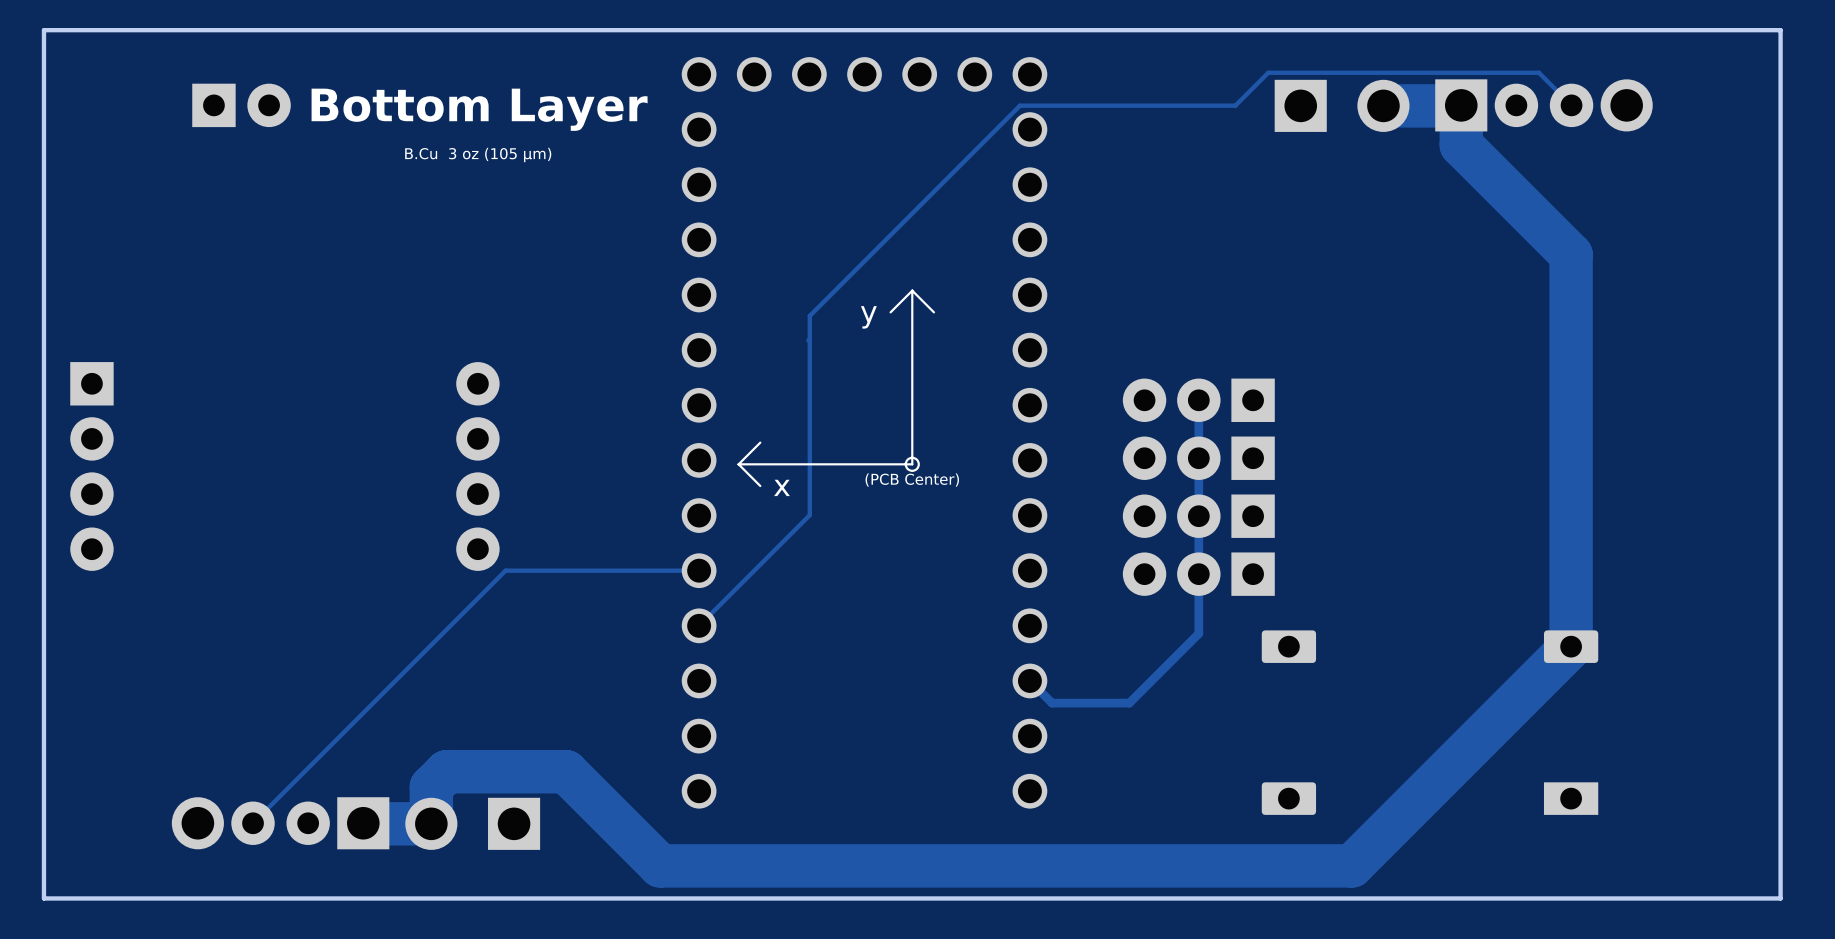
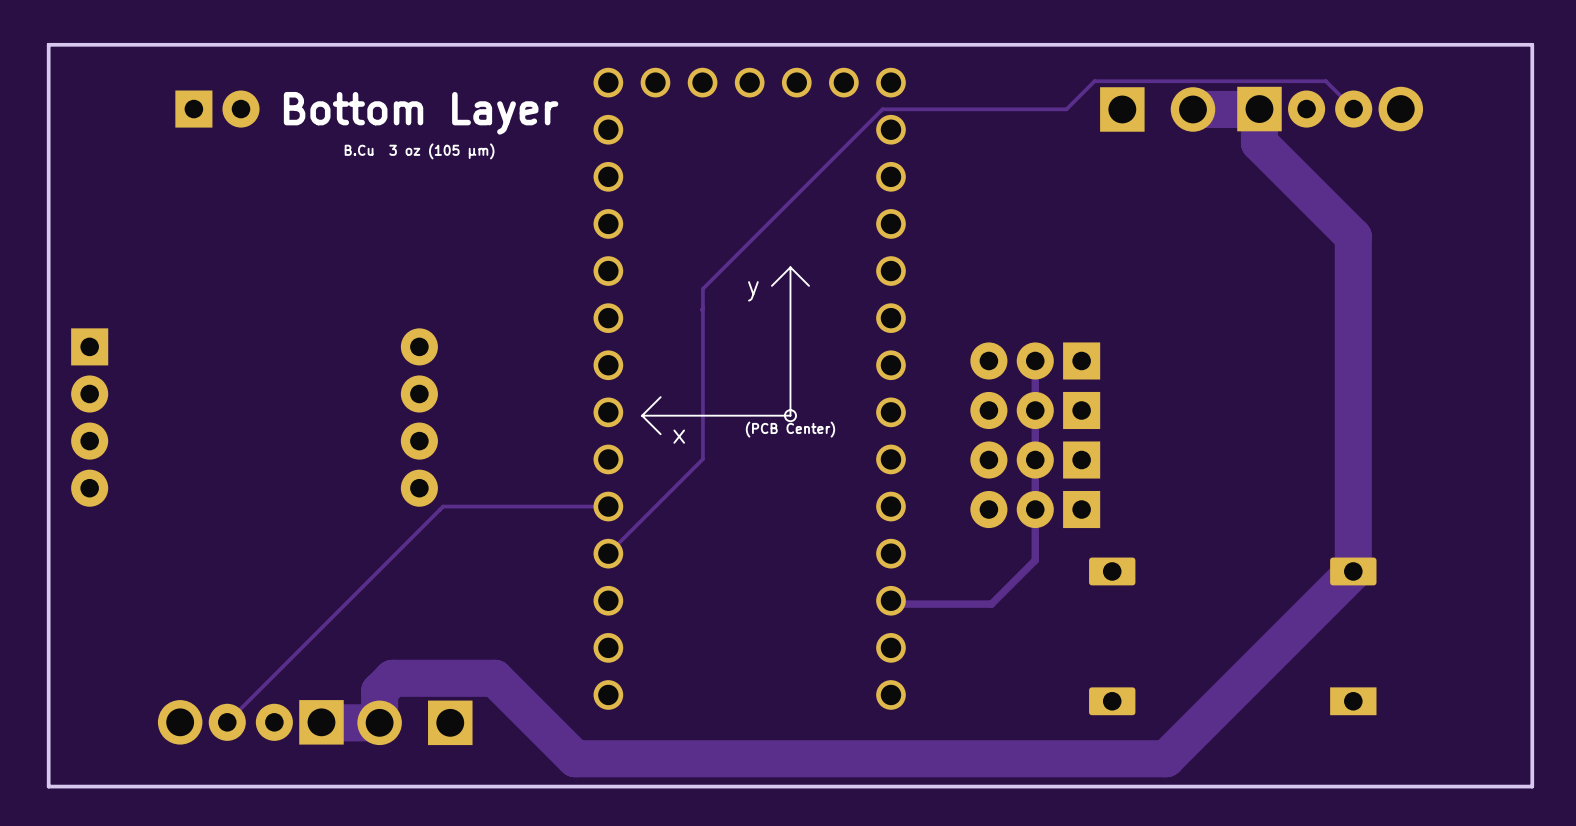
track: (1029, 680) (1052, 703) (1129, 703) (1147, 684) -> (896, 604) (991, 604)

